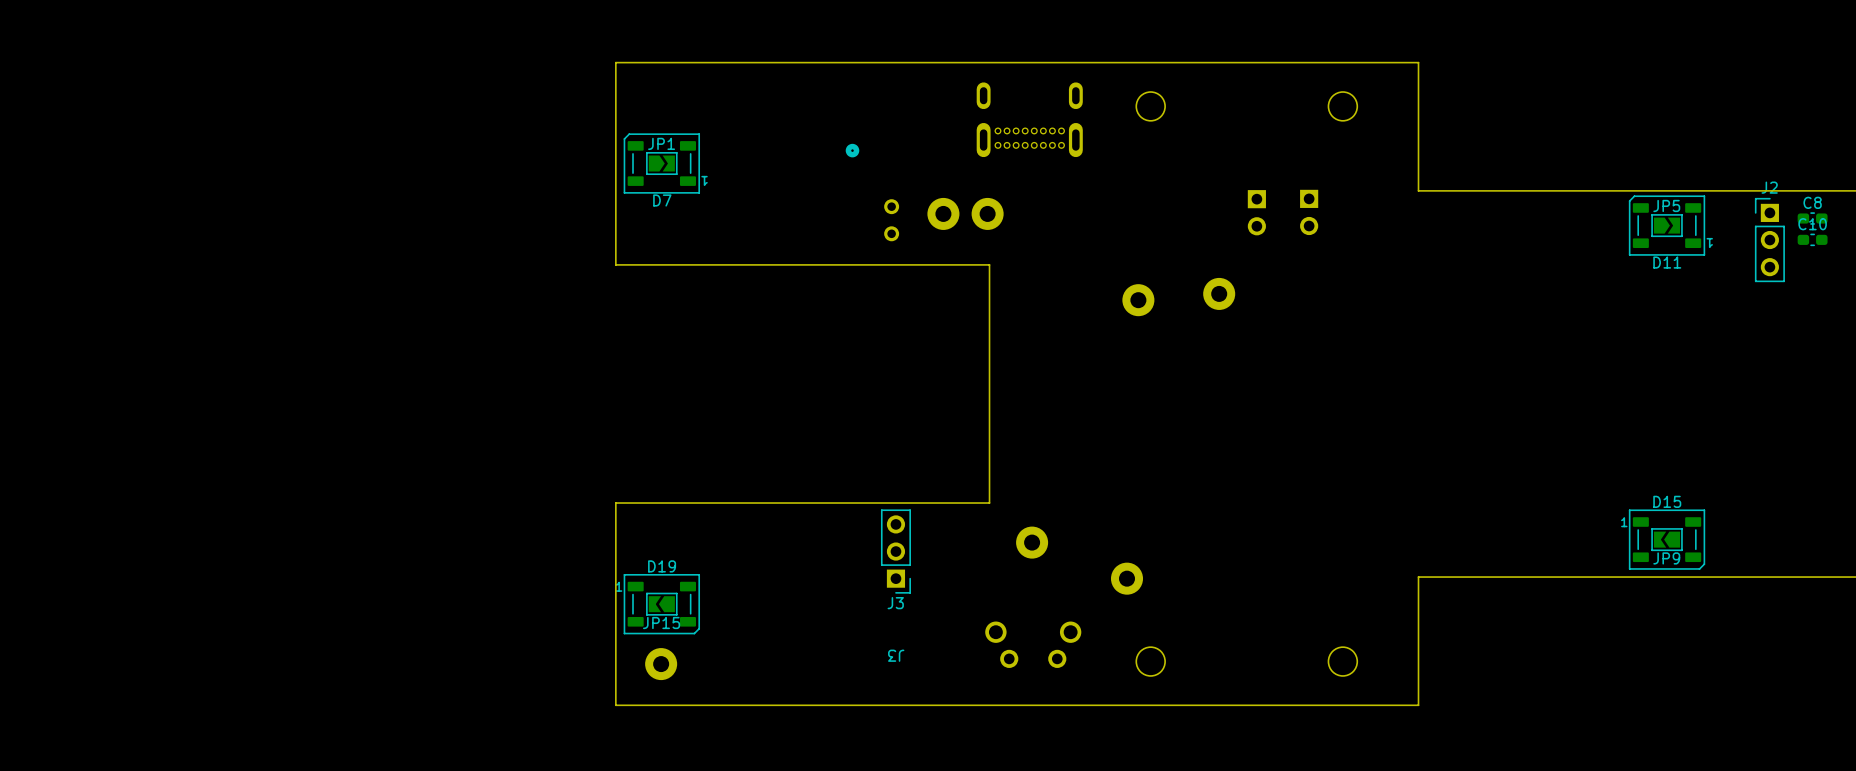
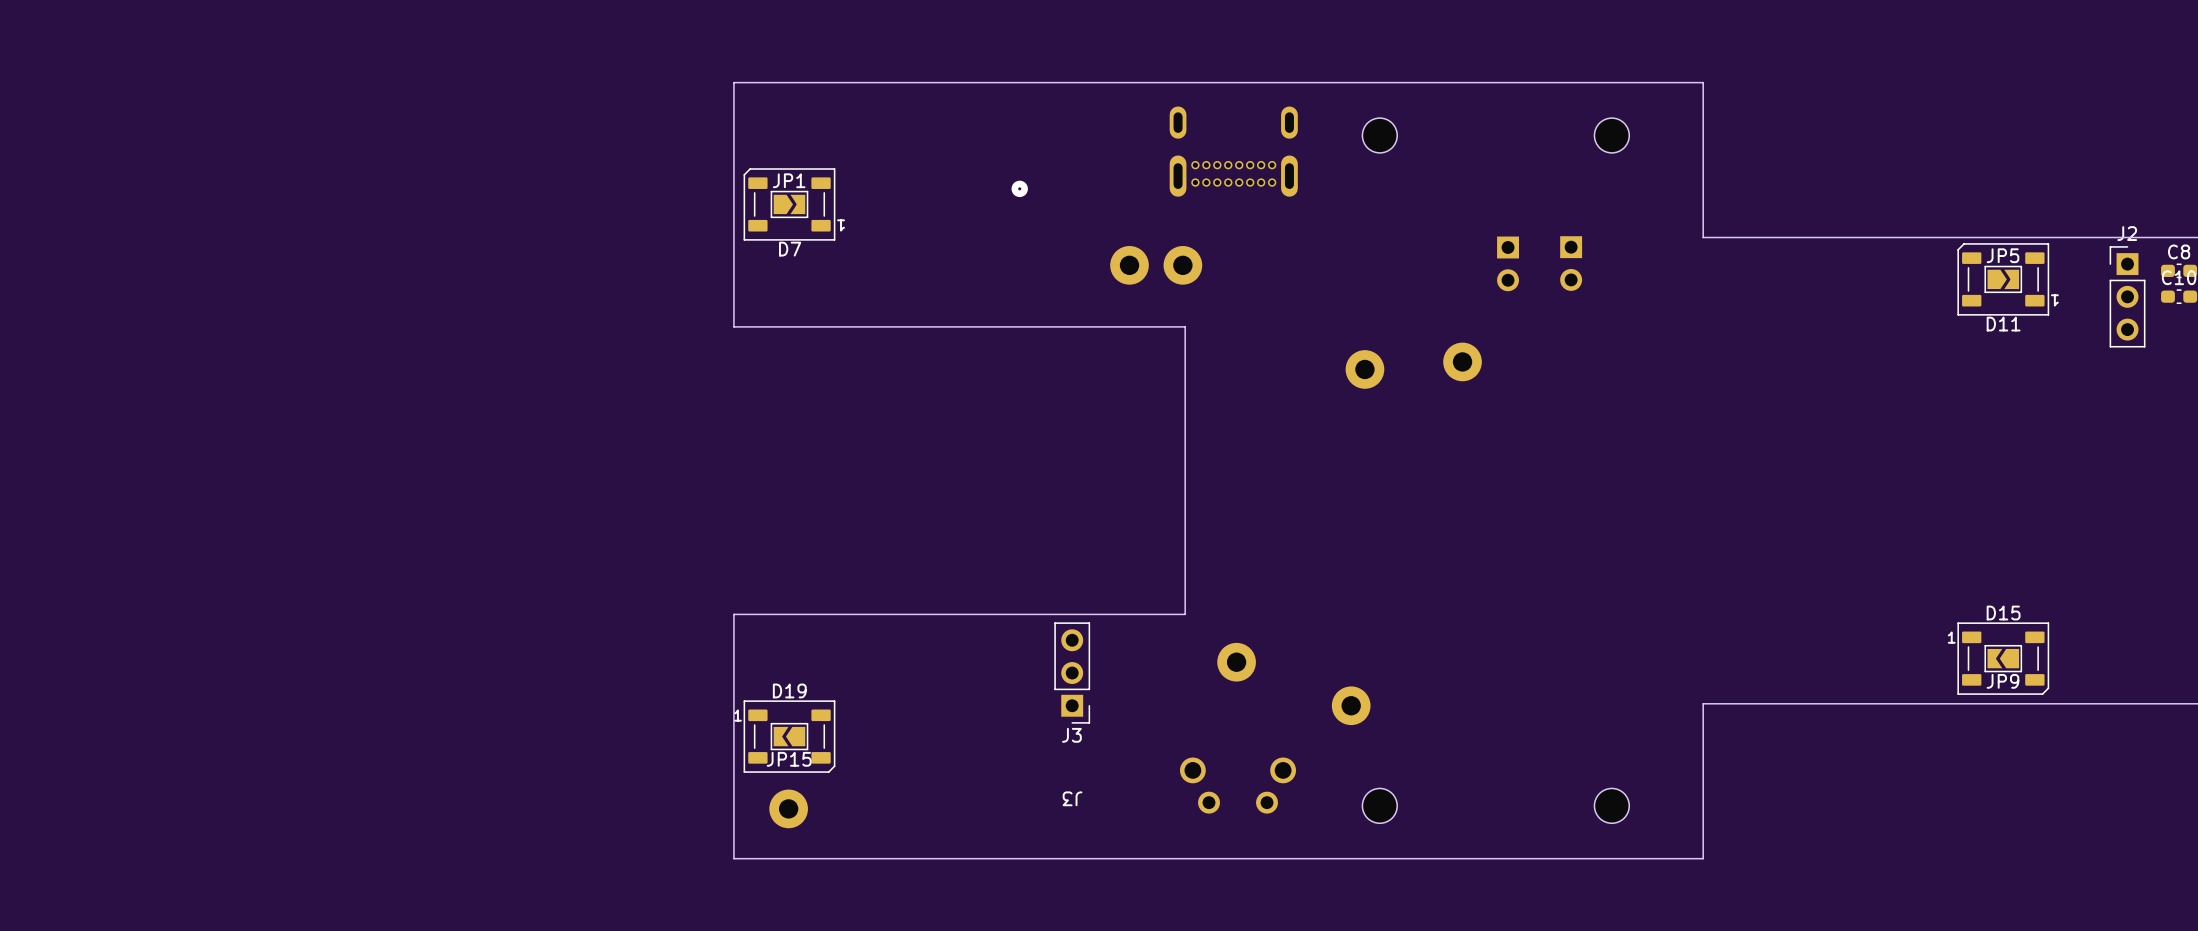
part: (891, 220) -> none

